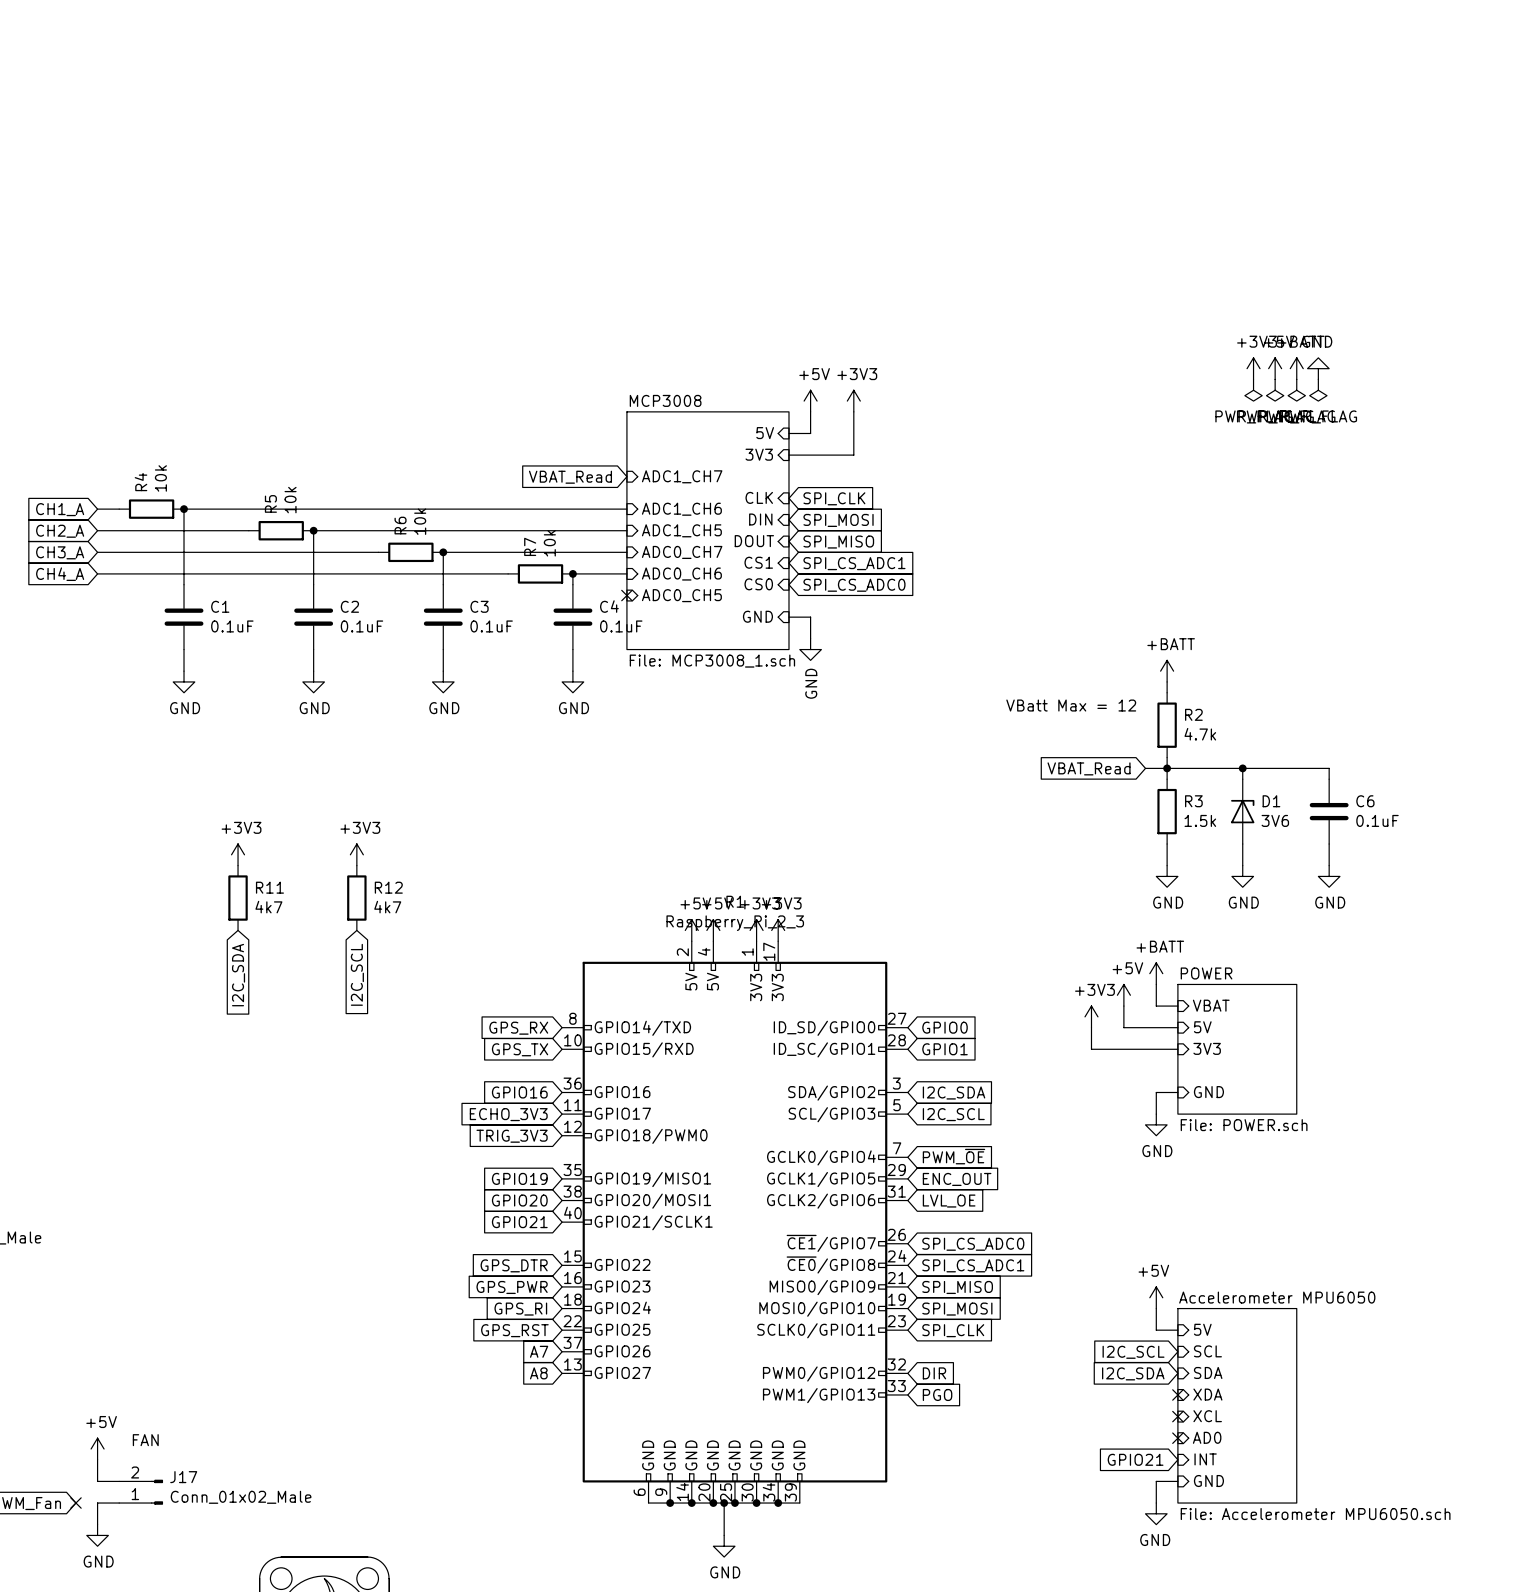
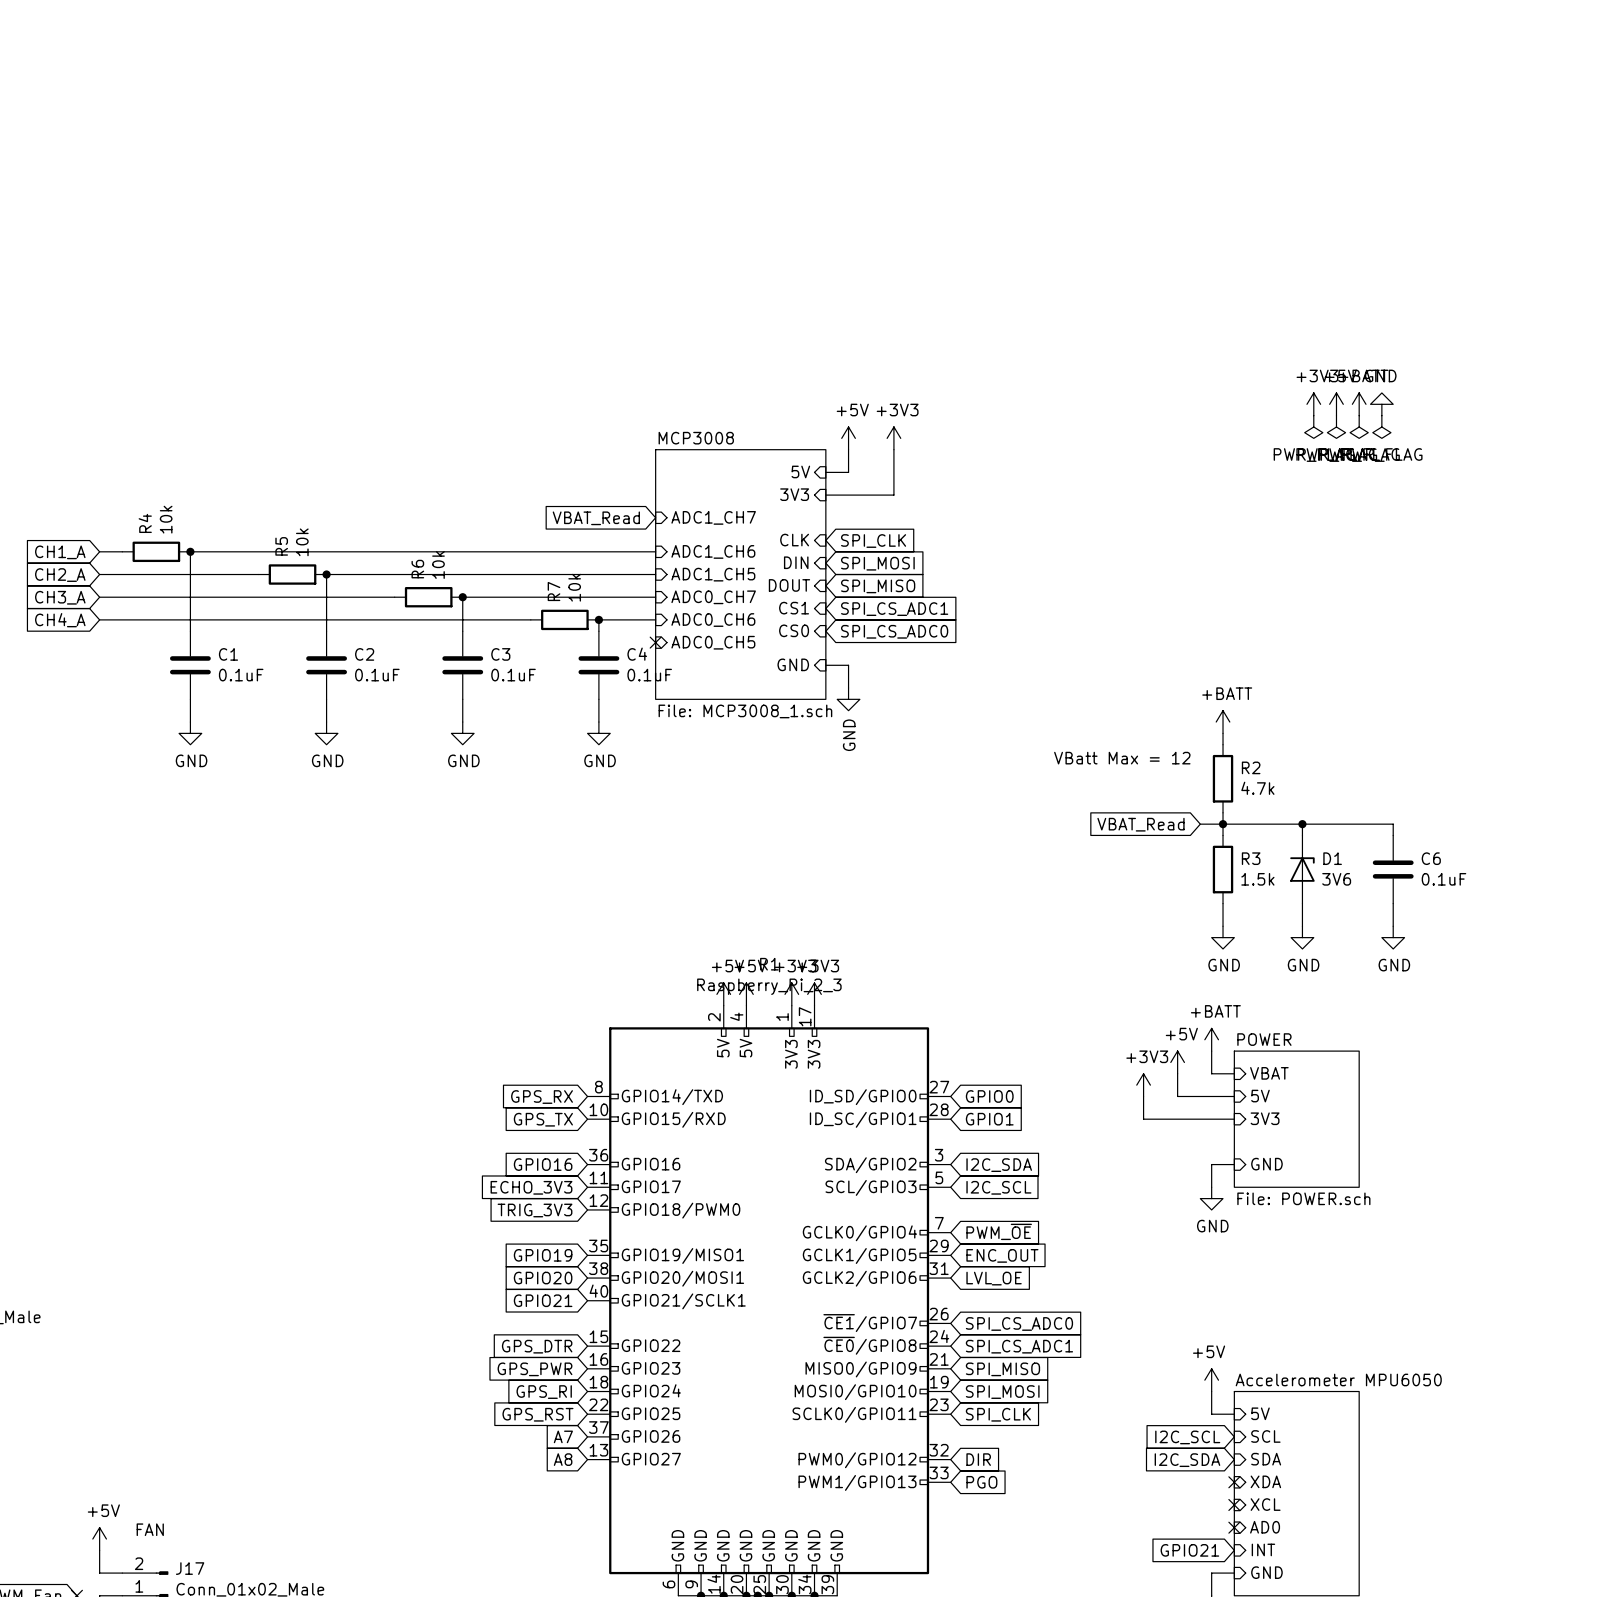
power symbol: +3V3 (238, 854) -> none
power symbol: +3V3 (356, 854) -> none
R11: 4k7 (238, 898) -> none
R12: 4k7 (356, 898) -> none
global label: I2C_SCL (357, 974) -> none
global label: I2C_SDA (238, 975) -> none

